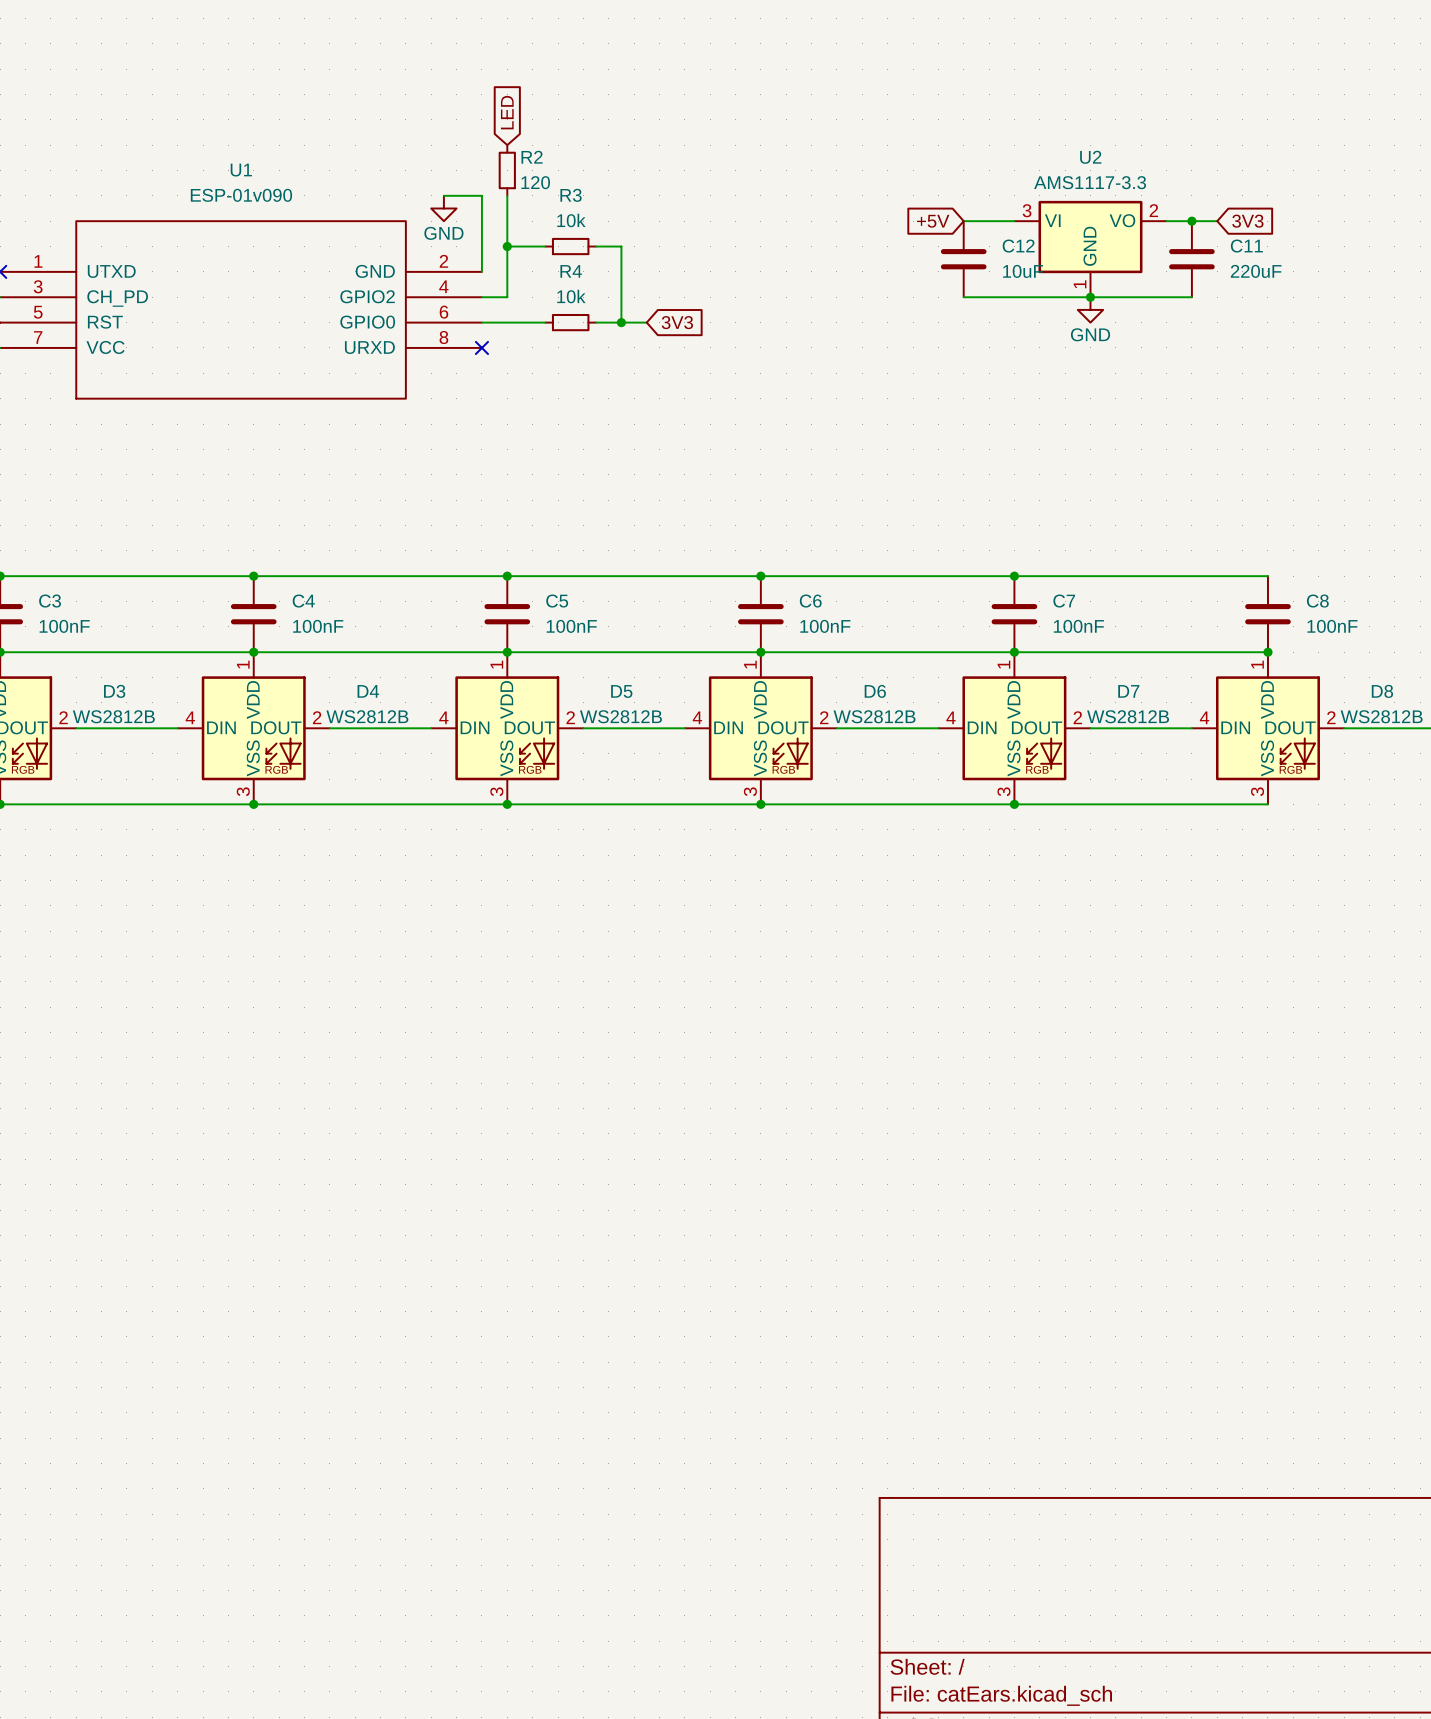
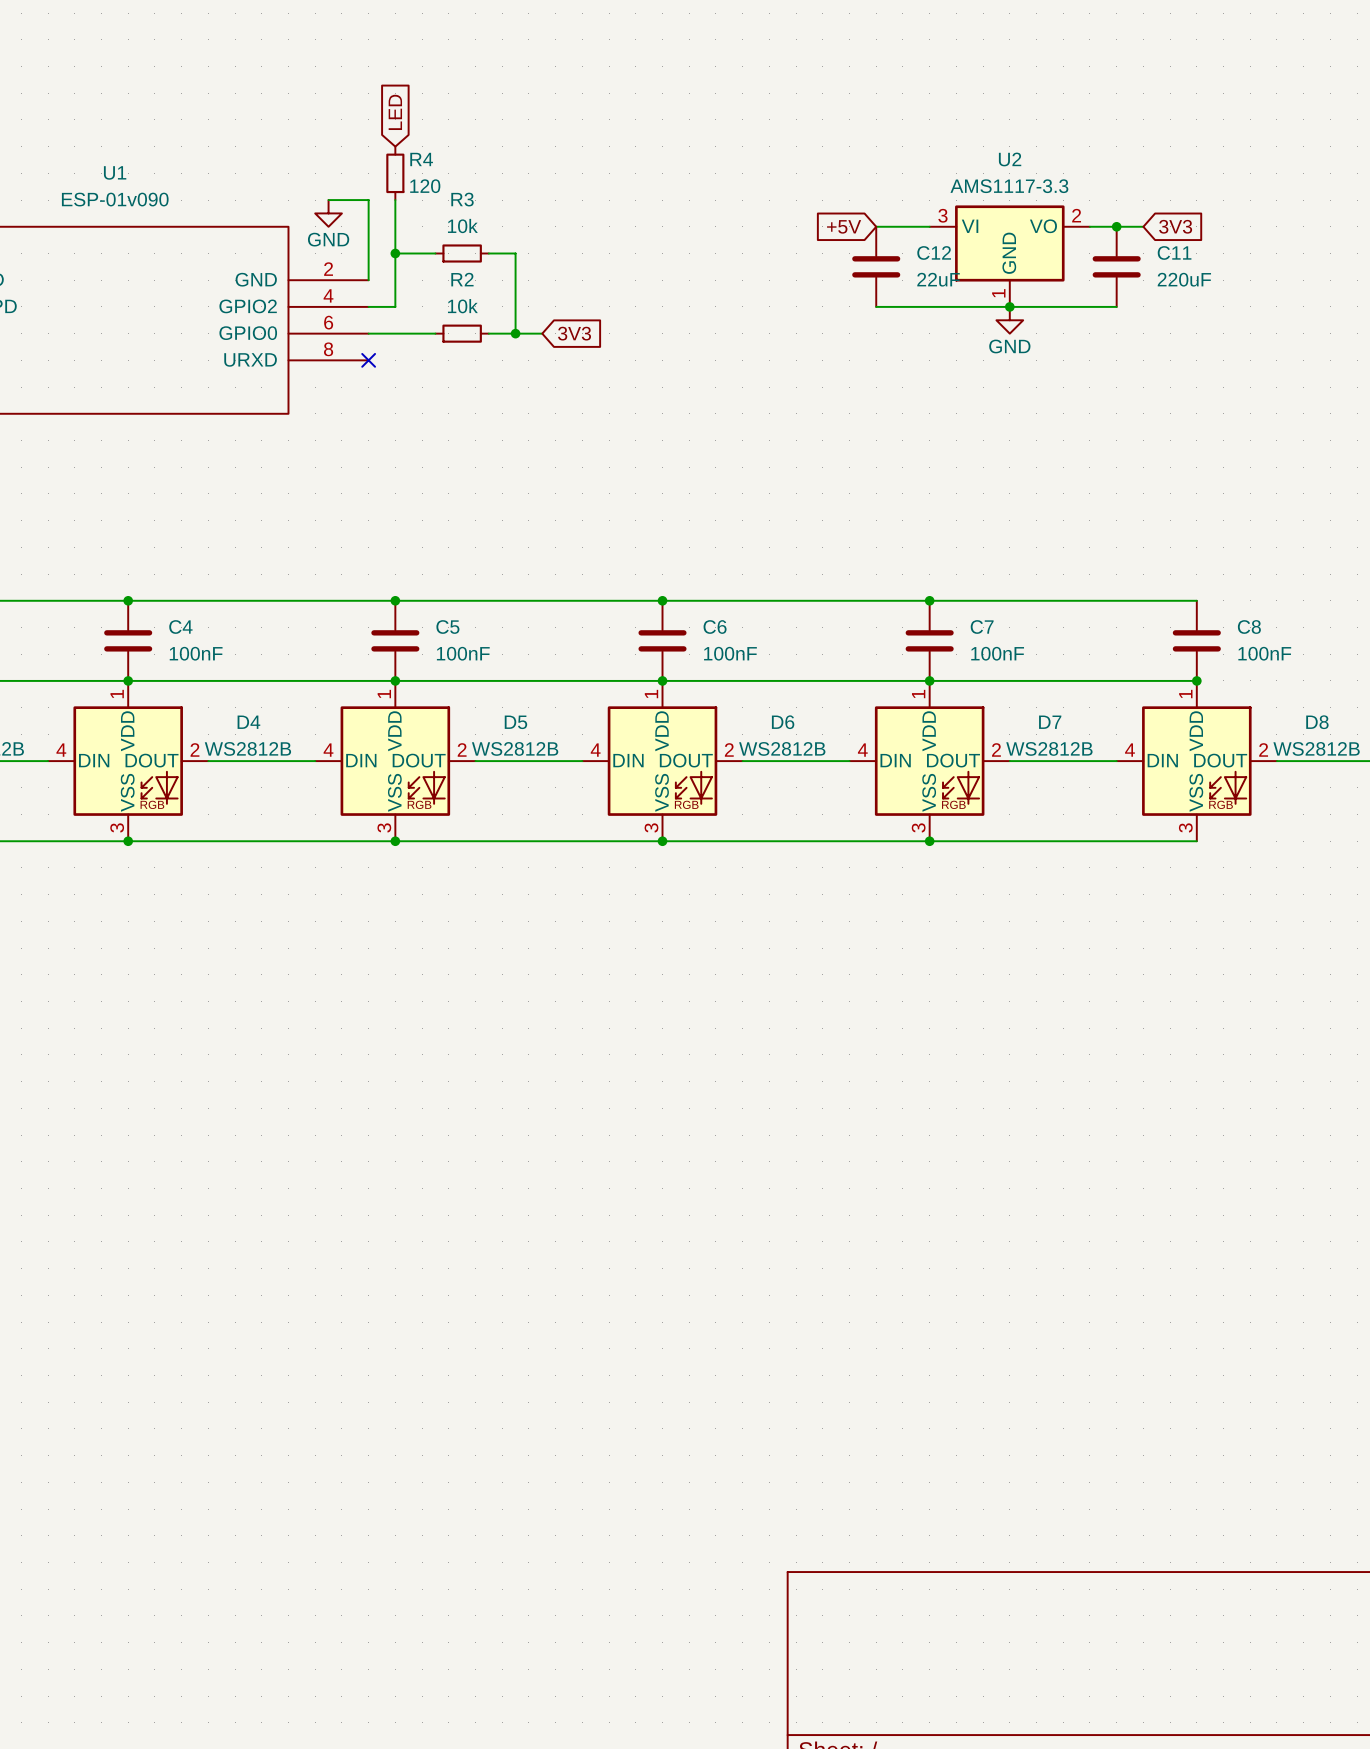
R2 name: R2 (532, 157) -> R4 (421, 159)
R4 name: R4 (571, 271) -> R2 (462, 279)
C12 value: 10uF (1023, 271) -> 22uF (938, 279)

